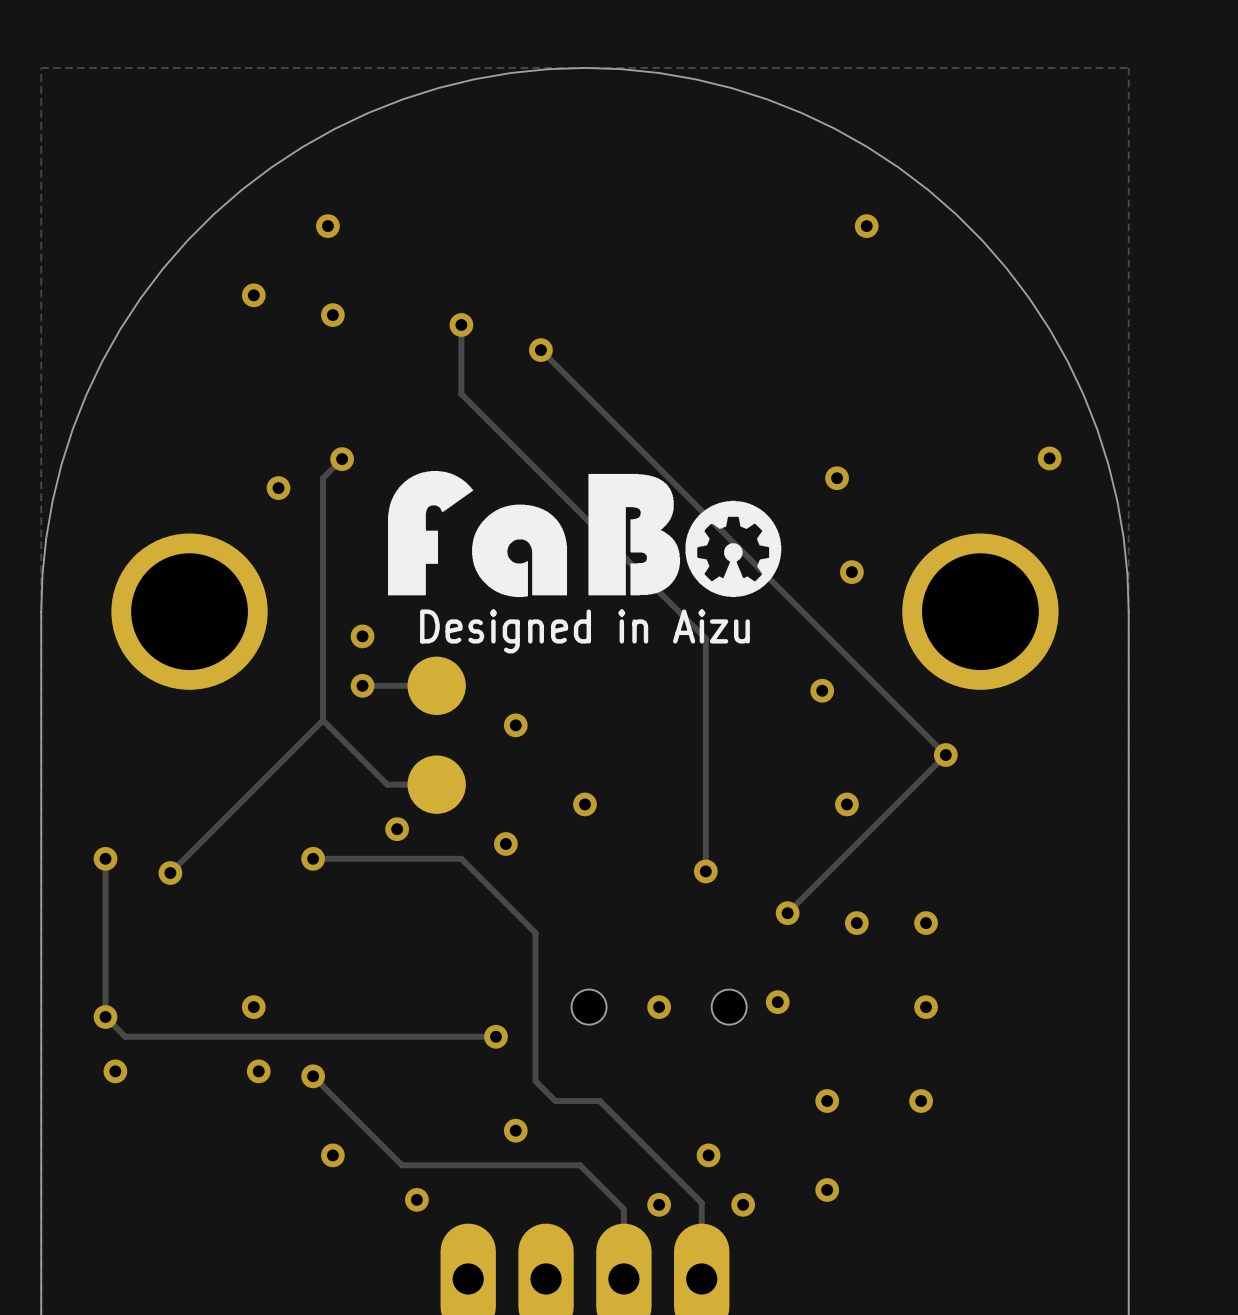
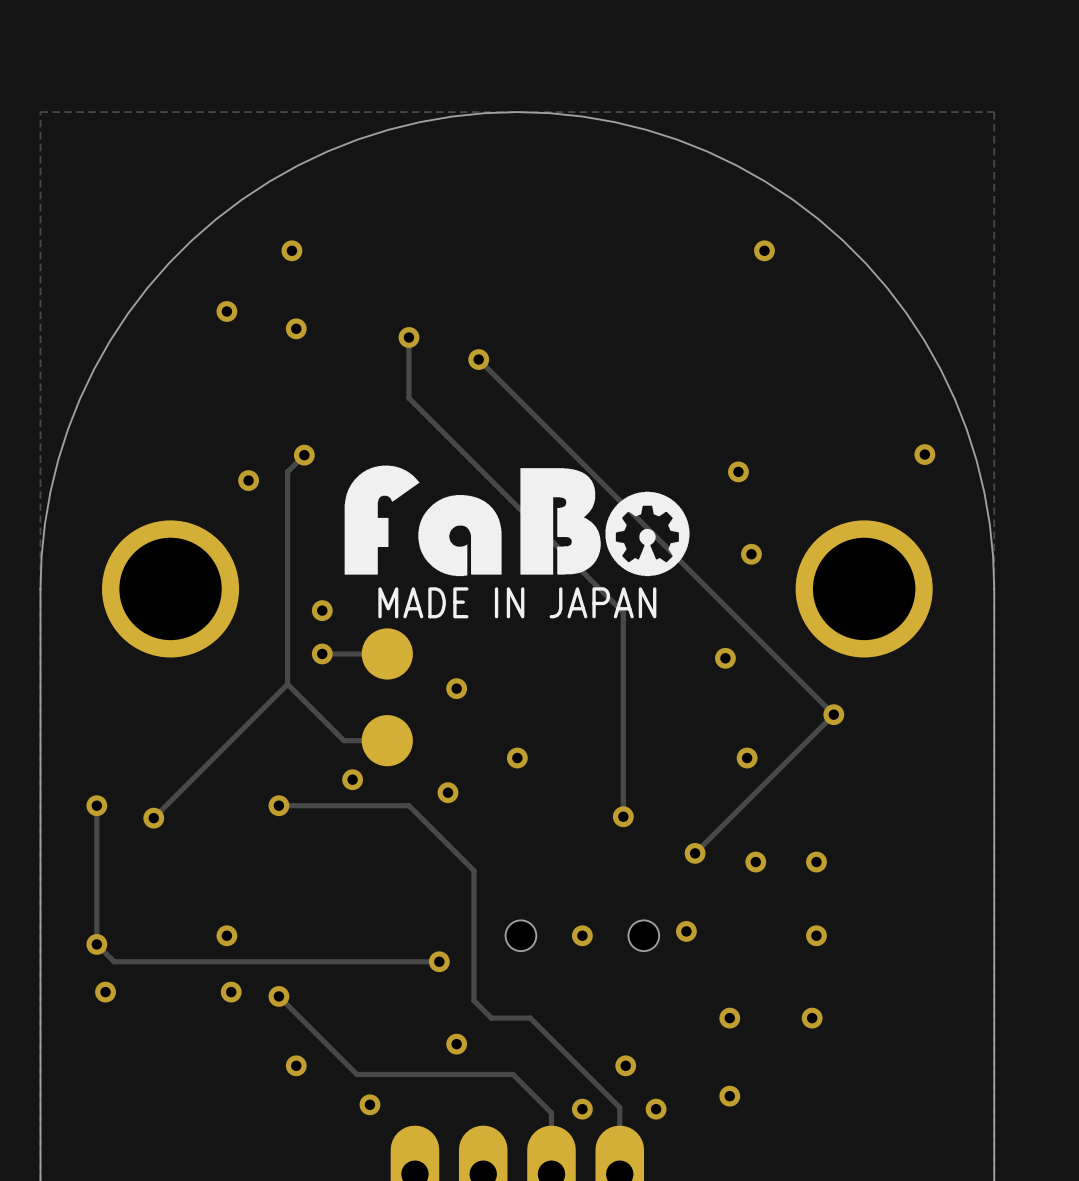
text: Designed in Aizu (584, 631) -> MADE IN JAPAN (517, 602)

